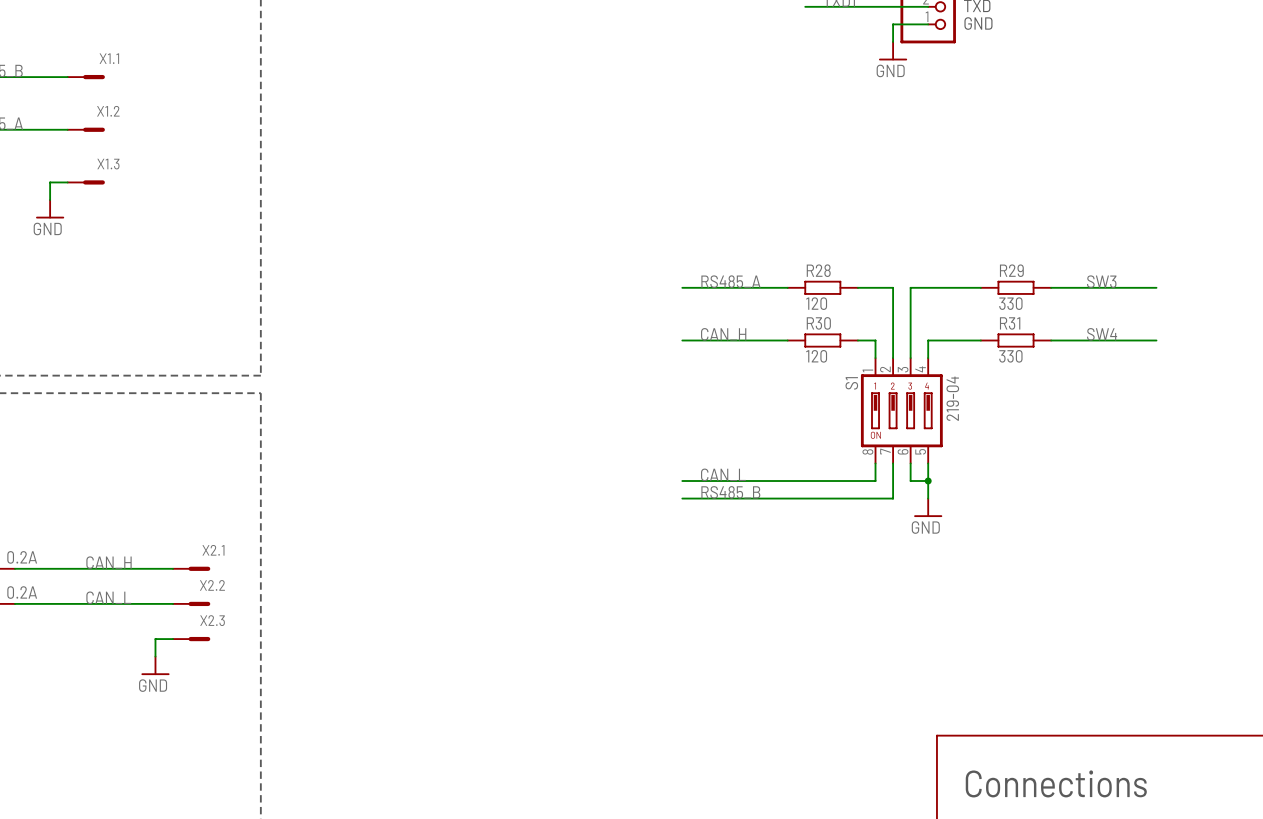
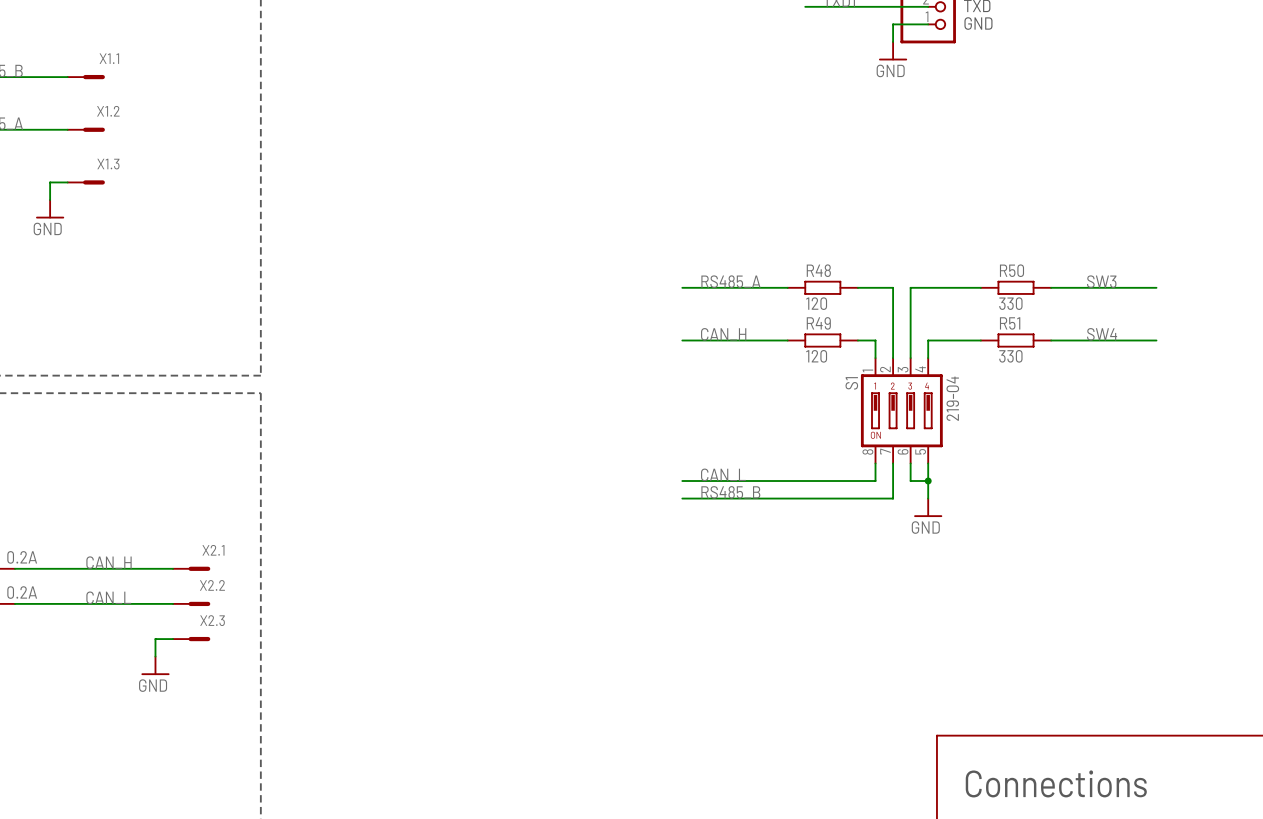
R28 name: R28 (818, 270) -> R48 (818, 270)
R29 name: R29 (1011, 270) -> R50 (1011, 270)
R30 name: R30 (818, 323) -> R49 (818, 323)
R31 name: R31 (1010, 323) -> R51 (1010, 323)

